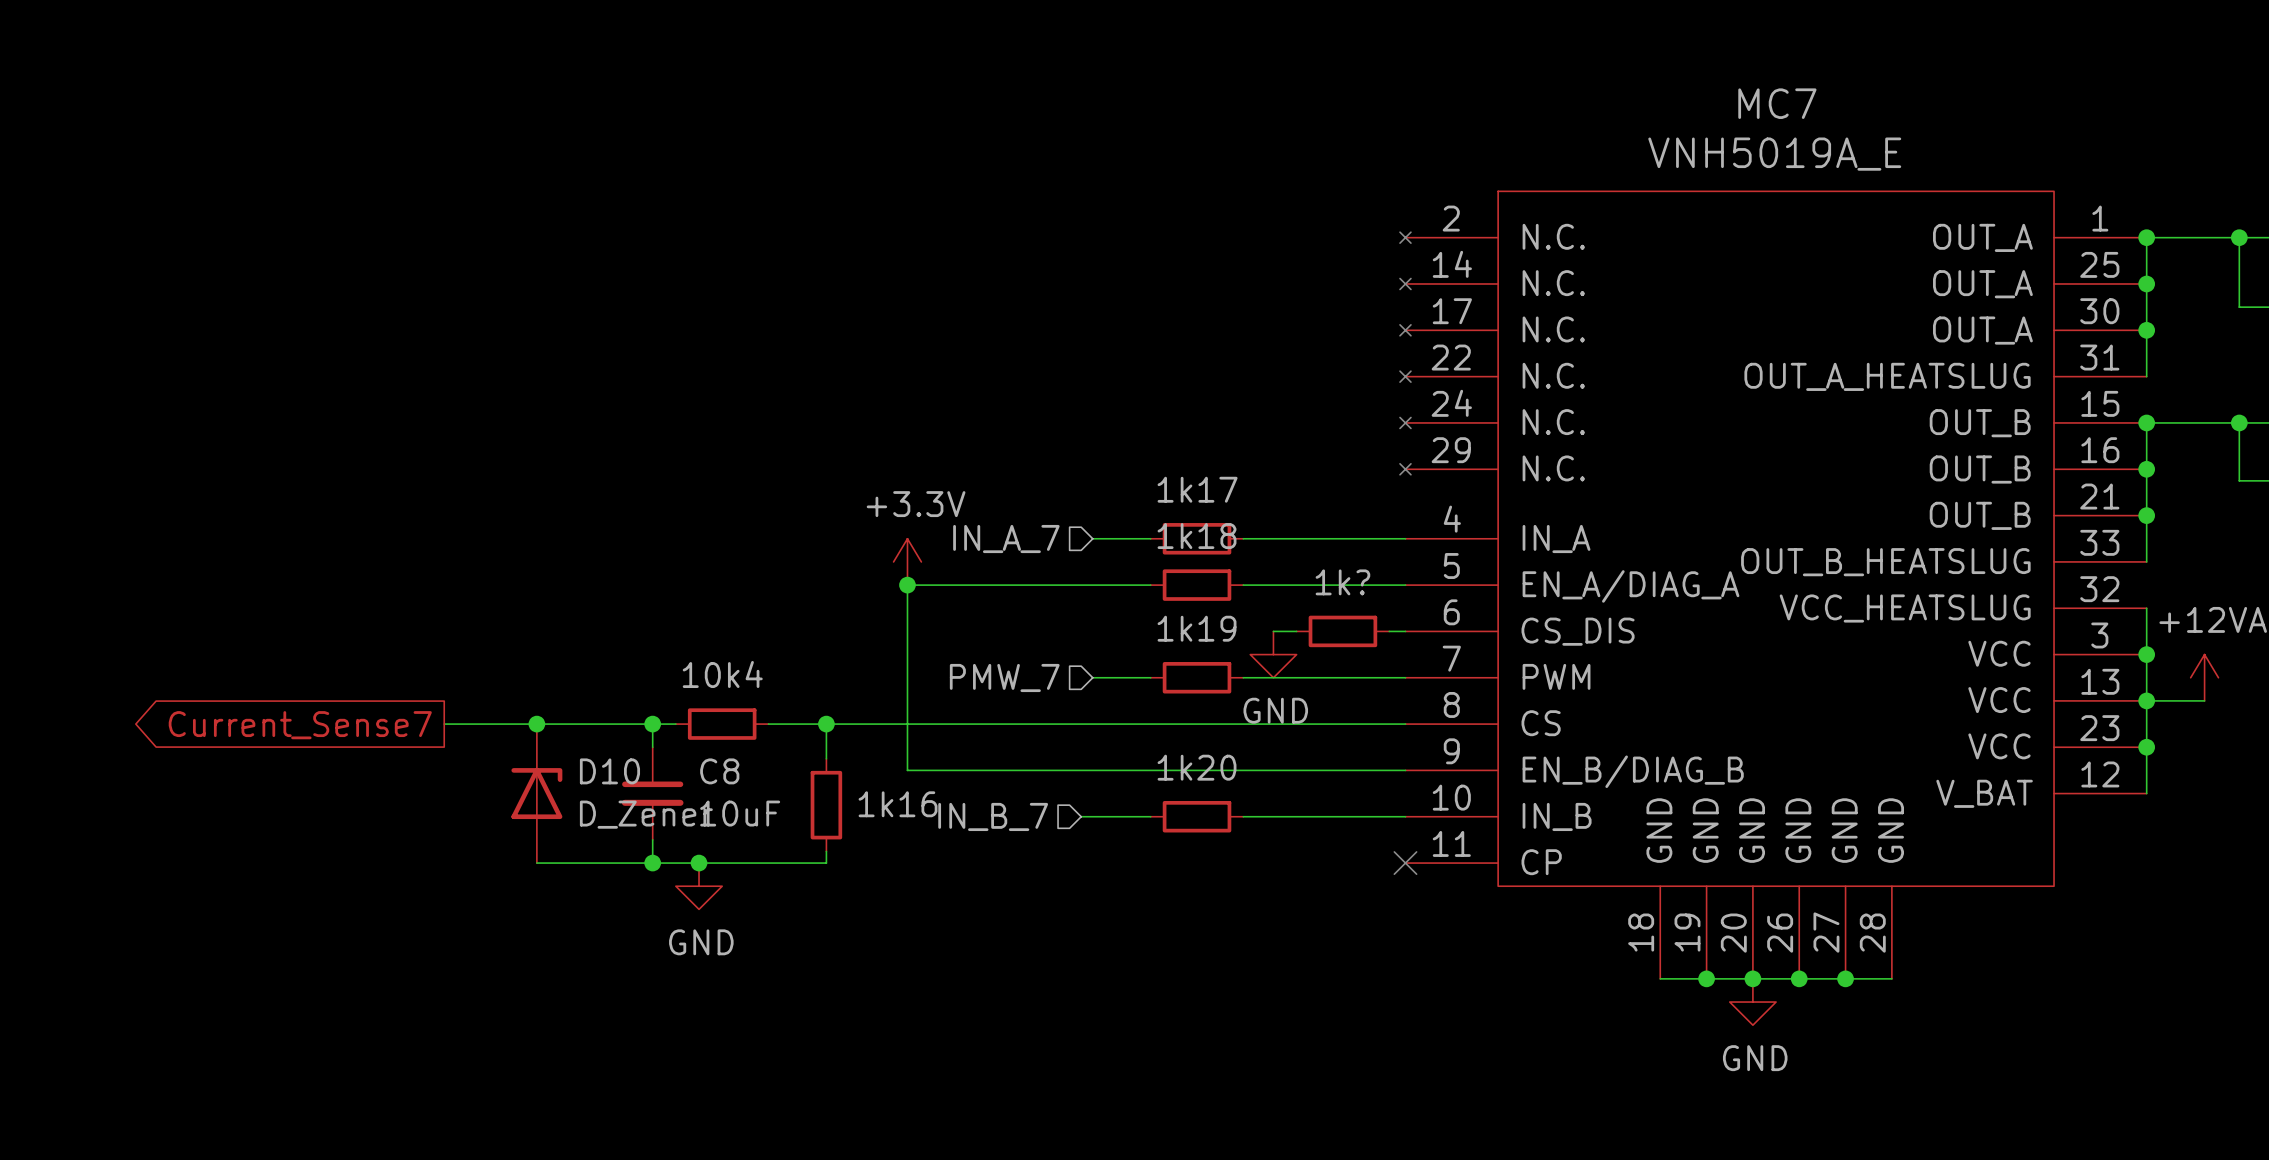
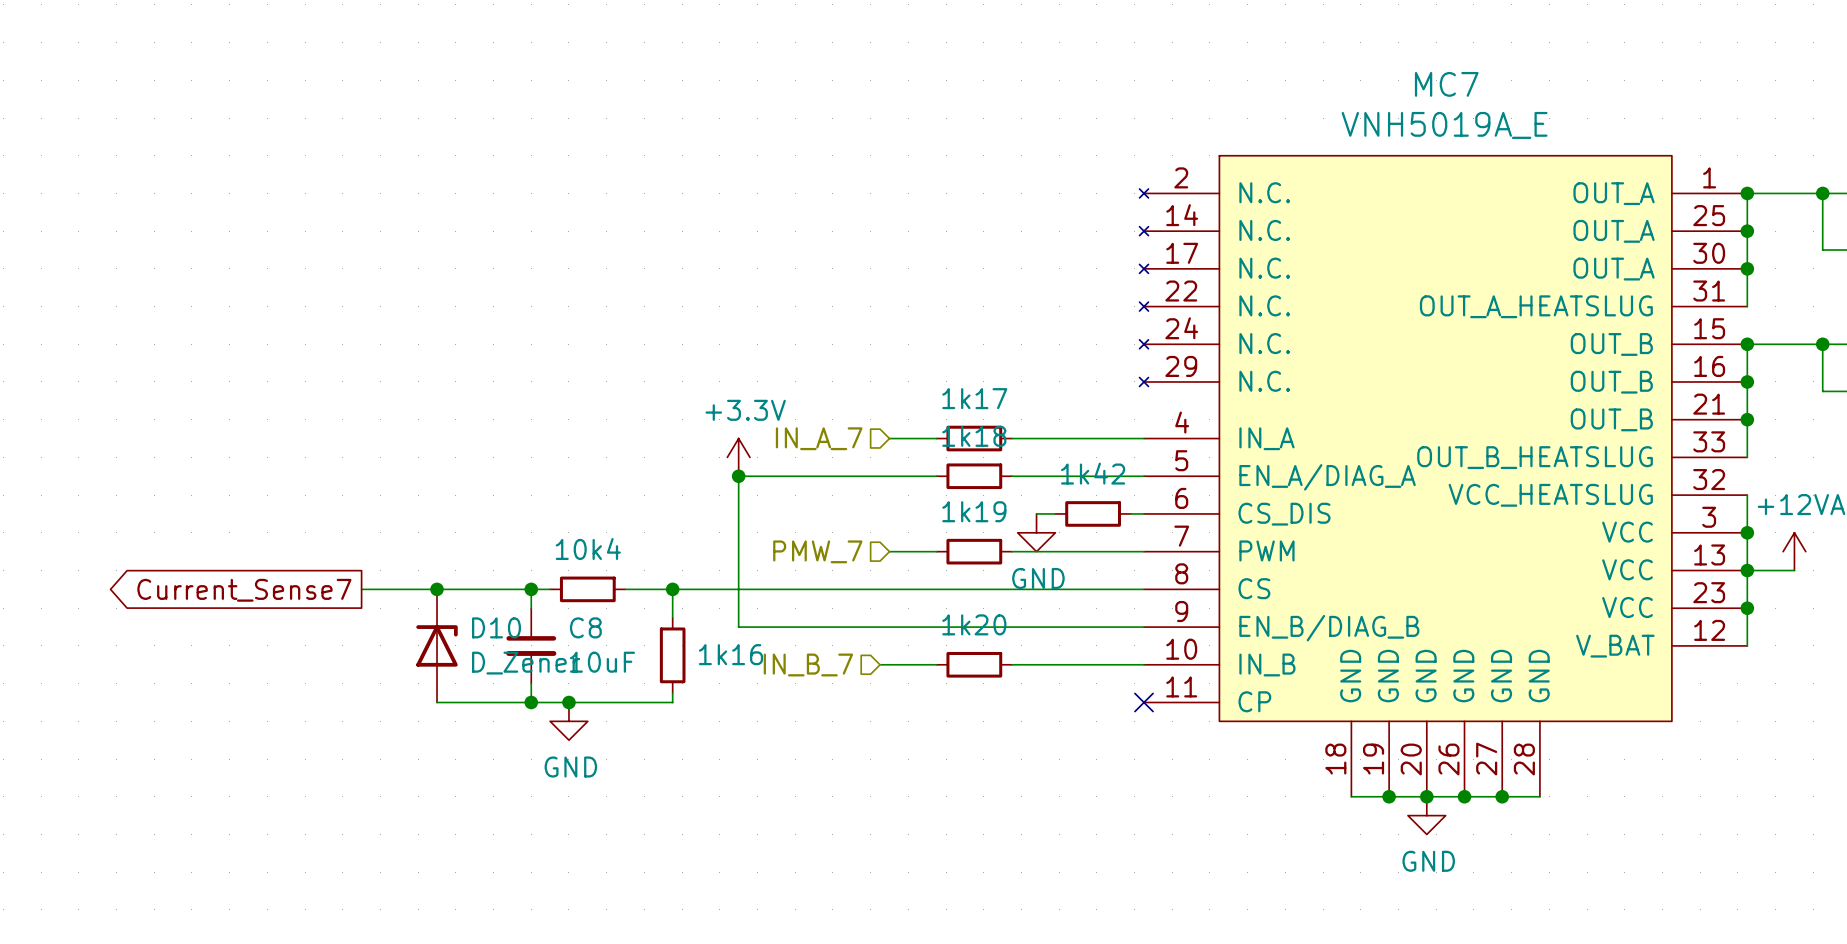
1k? name: 1k? (1342, 582) -> 1k42 (1093, 473)

